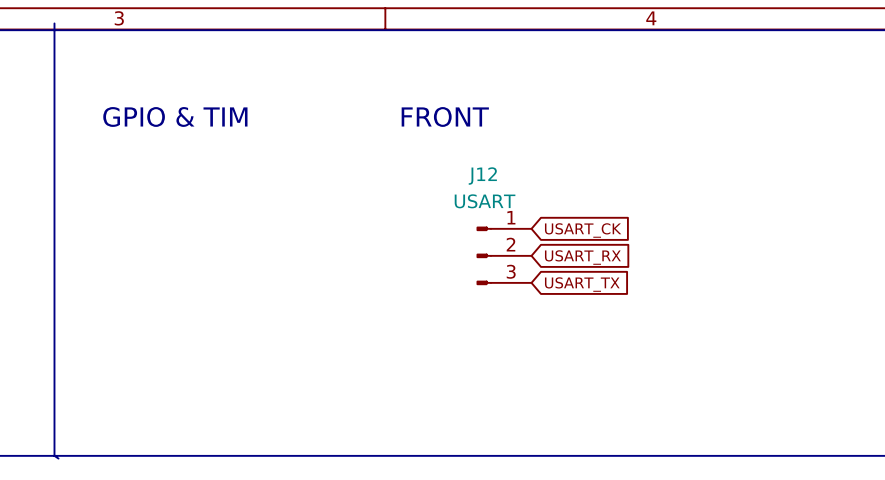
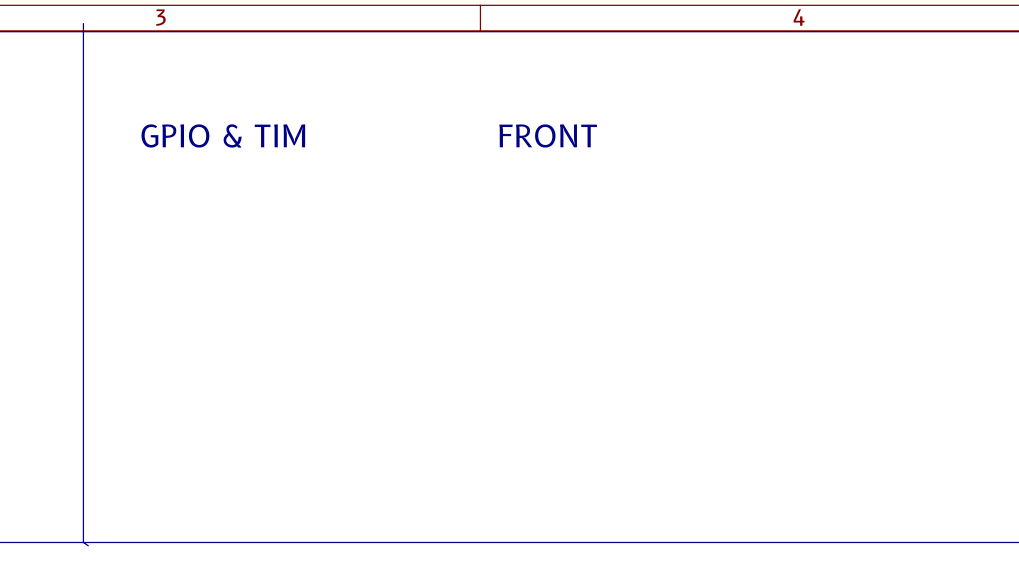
global label: USART_CK (583, 230) -> none
J12: USART (504, 255) -> none
global label: USART_RX (582, 257) -> none
global label: USART_TX (582, 284) -> none

